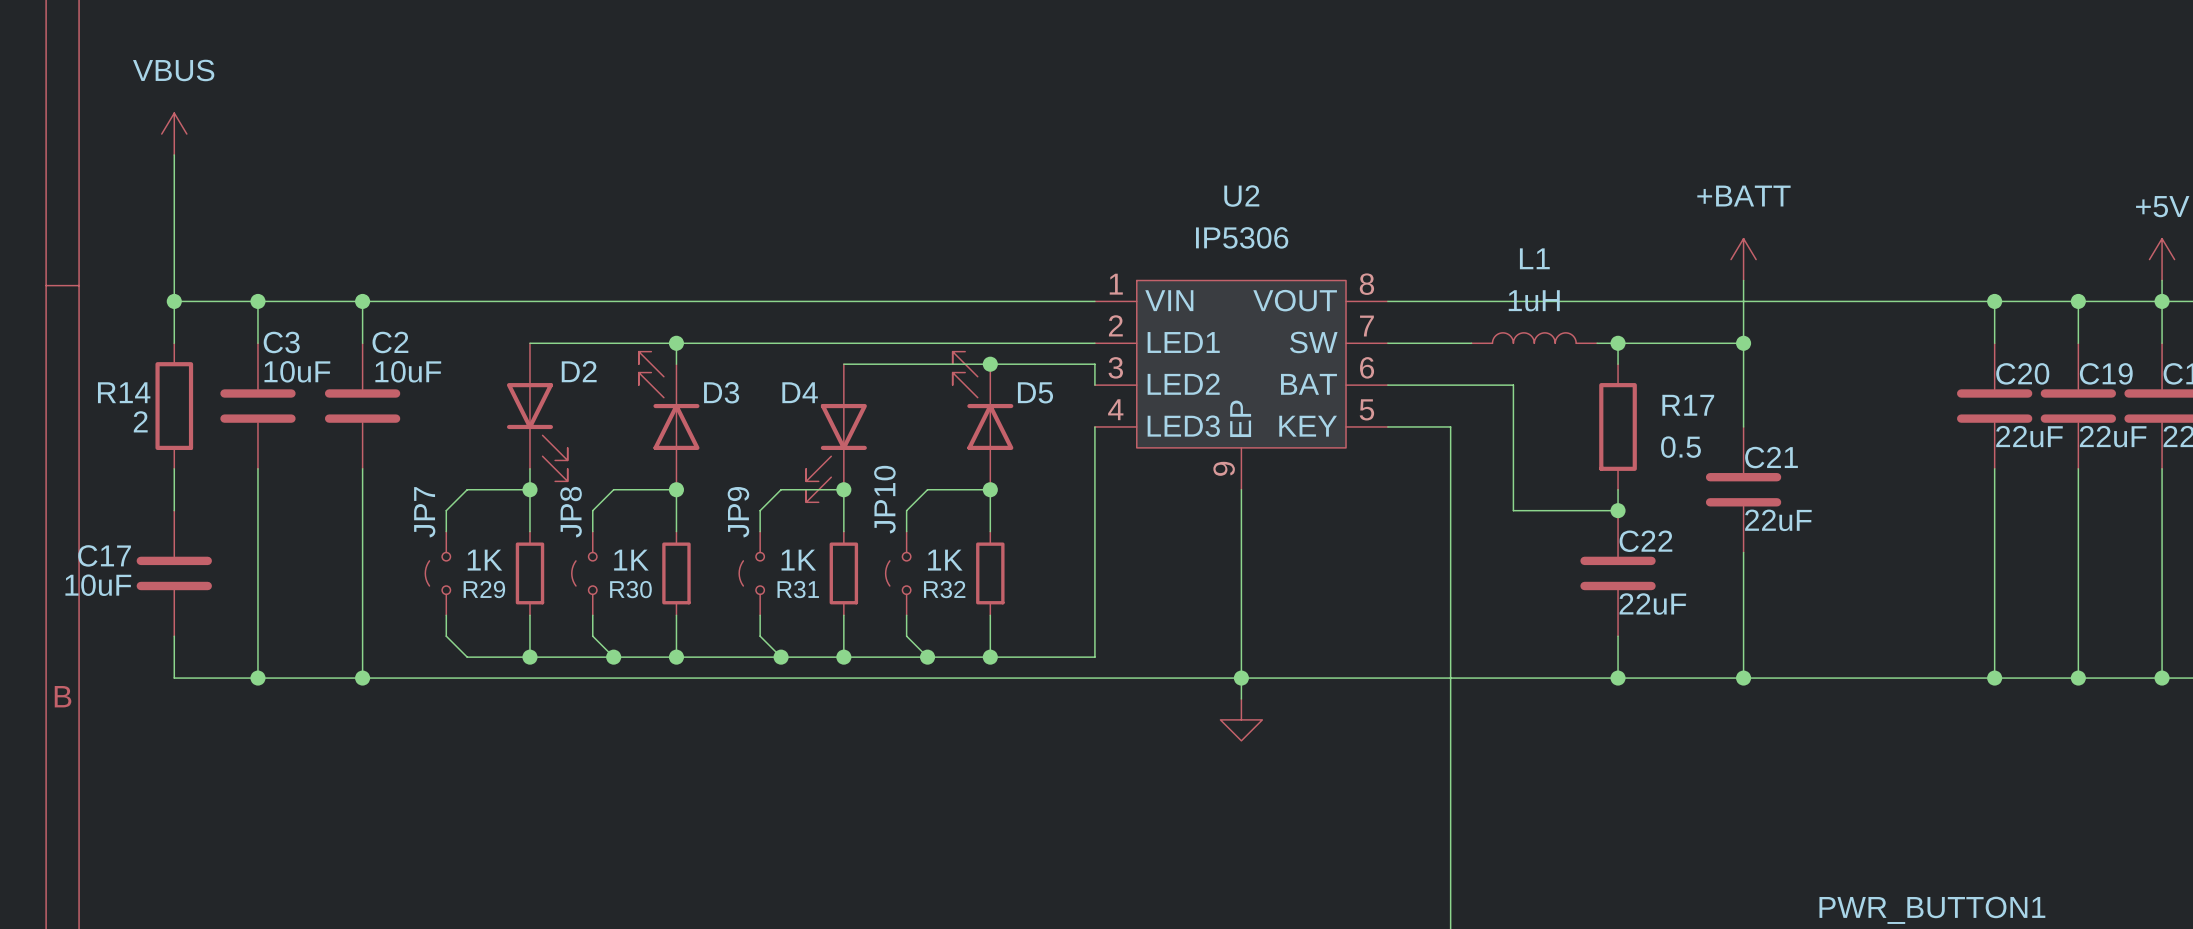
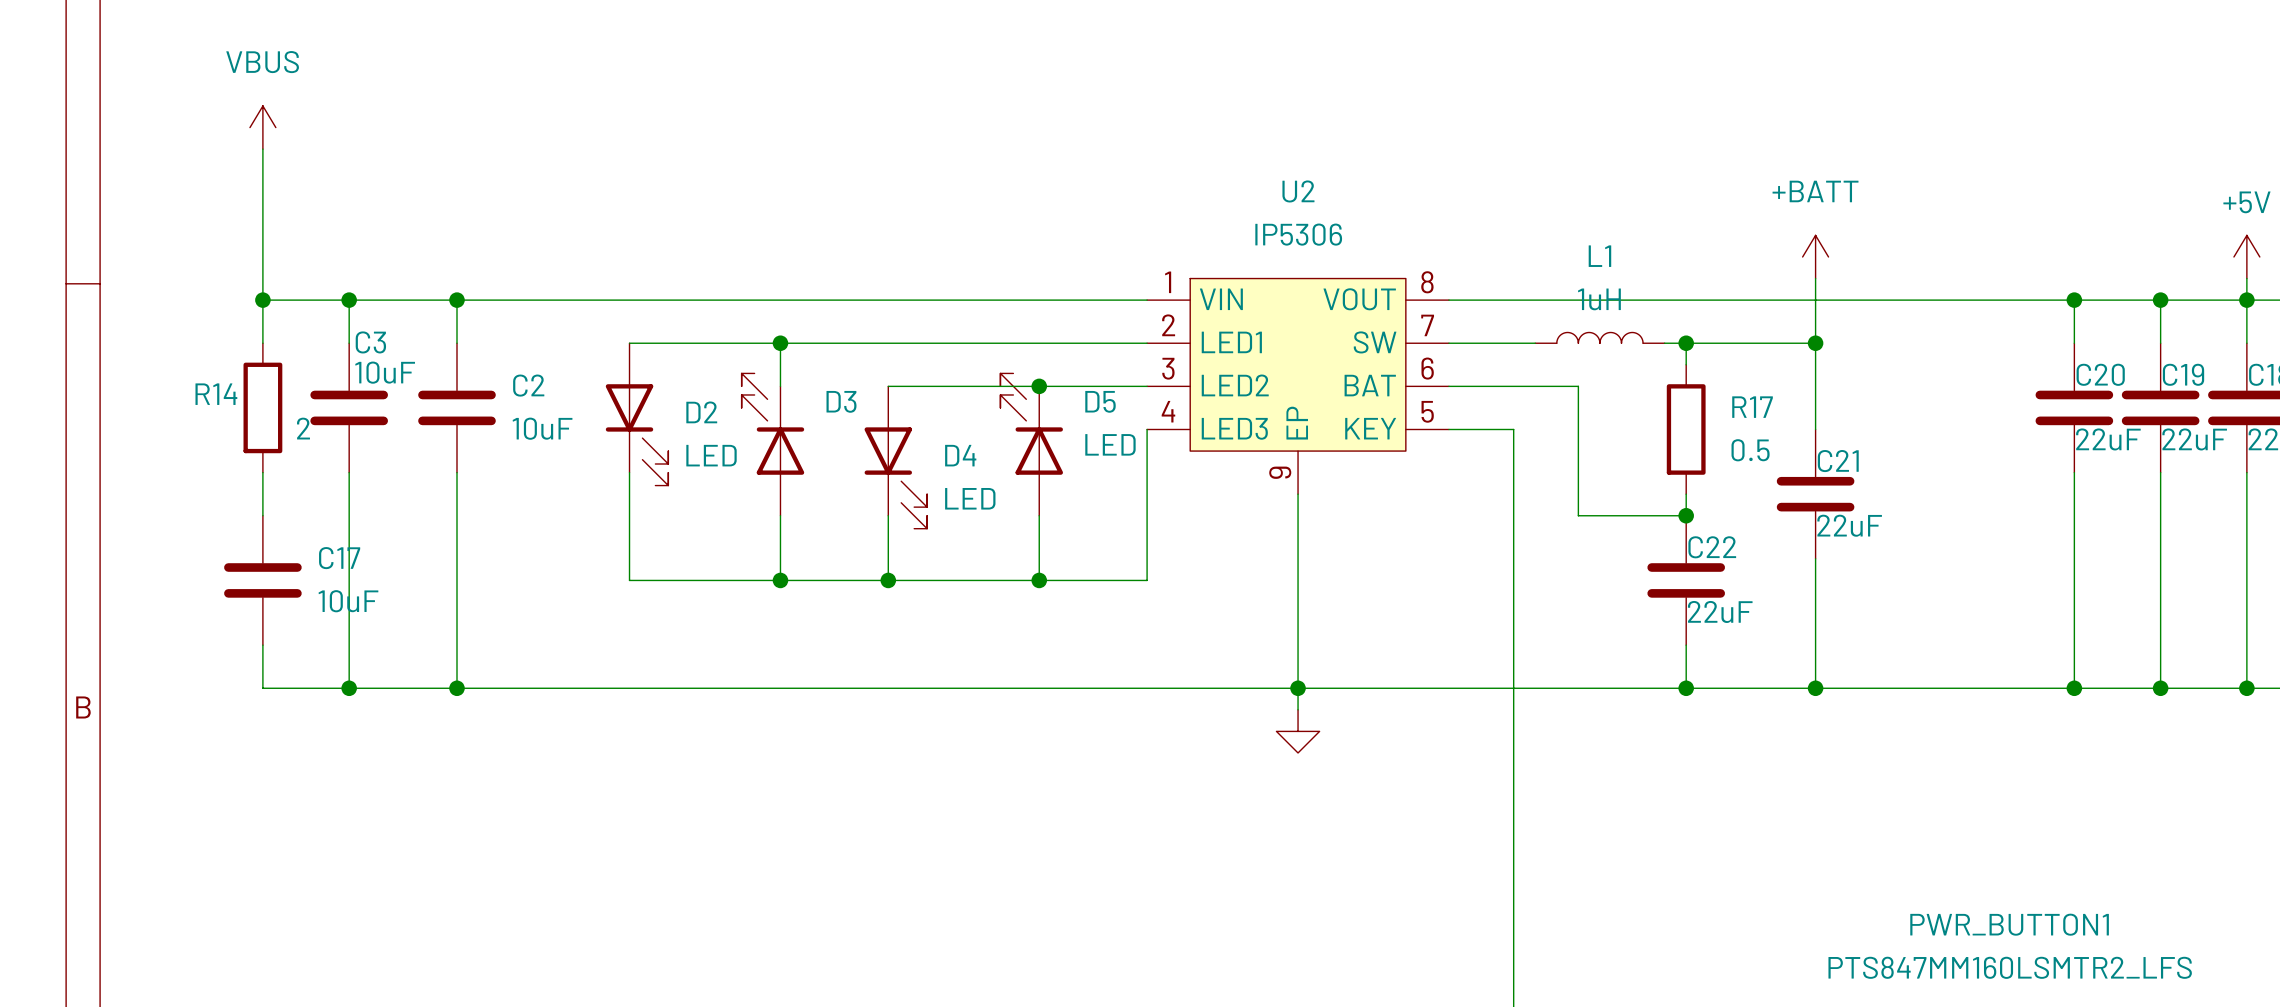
power symbol position: VBUS (174, 134) -> VBUS (262, 127)
wire: (174, 154) (174, 343) -> (262, 149) (262, 343)
wire: (174, 301) (237, 301) -> none
junction: (174, 301) -> none
wire: (257, 301) (257, 343) -> (349, 300) (349, 343)
junction position: (257, 301) -> (262, 300)
junction: none -> (349, 300)
wire: (362, 301) (362, 343) -> (456, 300) (456, 343)
junction: (362, 301) -> none
junction: none -> (456, 300)
C2 name position: C2 (390, 342) -> C2 (528, 385)
wire: (529, 343) (592, 343) -> none
wire: (676, 343) (676, 364) -> none
junction position: (676, 343) -> (780, 343)
wire: (843, 364) (1094, 364) (1094, 385) -> (888, 386) (1147, 386)
junction position: (990, 364) -> (1039, 386)
C2 value position: 10uF (408, 371) -> 10uF (542, 428)
D2 name position: D2 (579, 371) -> D2 (701, 412)
D3 name position: D3 (721, 392) -> D3 (841, 401)
D4 name position: D4 (800, 392) -> D4 (960, 455)
D5 name position: D5 (1035, 392) -> D5 (1100, 401)
R14 position: (174, 406) -> (262, 407)
C3 position: (257, 406) -> (349, 407)
C2 position: (362, 406) -> (456, 407)
D2 position: (537, 412) -> (637, 414)
D3 position: (669, 420) -> (772, 444)
D5 position: (982, 420) -> (1031, 444)
R14 value position: 2 (140, 421) -> 2 (303, 428)
D5 value: none -> LED (1110, 444)
D2 value: none -> LED (711, 455)
D4 flip: as is (836, 453) -> left-right (895, 478)
wire: (174, 468) (174, 510) -> (262, 472) (262, 515)
wire: (257, 468) (257, 678) -> (349, 472) (349, 688)
wire: (362, 468) (362, 678) -> (456, 472) (456, 688)
wire: (529, 468) (529, 531) -> (780, 515) (780, 580)
wire: (529, 489) (467, 489) (446, 510) (446, 531) -> none
junction: (529, 489) -> none
junction: (676, 489) -> none
junction: (843, 489) -> none
junction: (990, 489) -> none
D4 value: none -> LED (970, 498)
wire: (592, 510) (613, 489) (676, 489) (676, 531) -> (629, 515) (629, 472)
wire: (843, 510) (843, 489) (781, 489) (760, 510) (760, 531) -> none
wire: (990, 510) (990, 489) (927, 489) (906, 510) (906, 531) -> none
C17 name position: C17 (104, 555) -> C17 (339, 558)
C17 position: (174, 573) -> (262, 580)
JP7: (437, 573) -> none
R29: 1K (529, 573) -> none
JP8: (584, 573) -> none
R30: 1K (676, 573) -> none
junction: none -> (780, 580)
JP9: (751, 573) -> none
junction: none -> (888, 580)
R31: 1K (843, 573) -> none
JP10: (898, 573) -> none
junction: none -> (1039, 580)
R32: 1K (990, 573) -> none
wire: (1094, 573) (1094, 657) (467, 657) (446, 636) (446, 615) -> (1147, 580) (629, 580) (629, 537)
C17 value position: 10uF (98, 585) -> 10uF (348, 601)
wire: (529, 615) (529, 657) -> none
wire: (592, 615) (592, 636) (613, 657) -> none
wire: (676, 615) (676, 657) -> (780, 343) (780, 386)
wire: (760, 615) (760, 636) (781, 657) -> none
wire: (843, 615) (843, 657) -> (888, 537) (888, 580)
wire: (906, 615) (906, 636) (927, 657) -> none
wire: (990, 615) (990, 657) -> (1039, 537) (1039, 580)
wire: (174, 636) (174, 678) (237, 678) -> (262, 645) (262, 688)
junction: (529, 657) -> none
junction: (613, 657) -> none
junction: (676, 657) -> none
junction: (781, 657) -> none
junction: (843, 657) -> none
junction: (927, 657) -> none
junction: (990, 657) -> none
junction: (257, 678) -> none
junction: none -> (349, 688)
junction: (362, 678) -> none
junction: none -> (456, 688)

